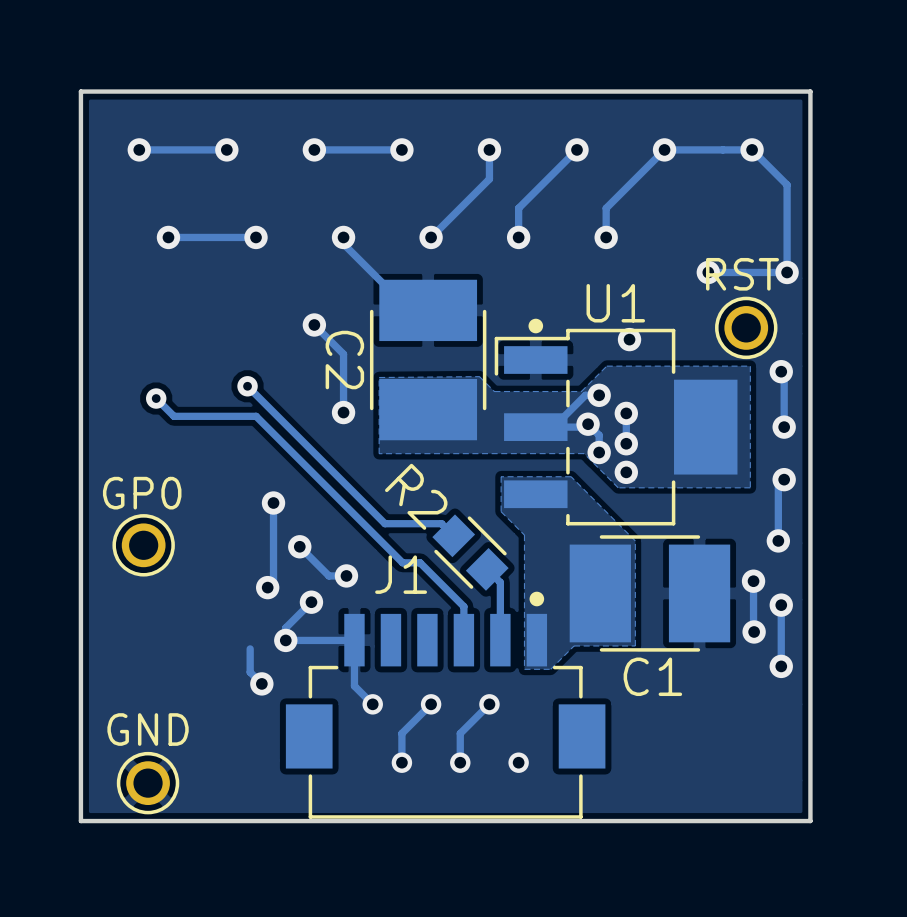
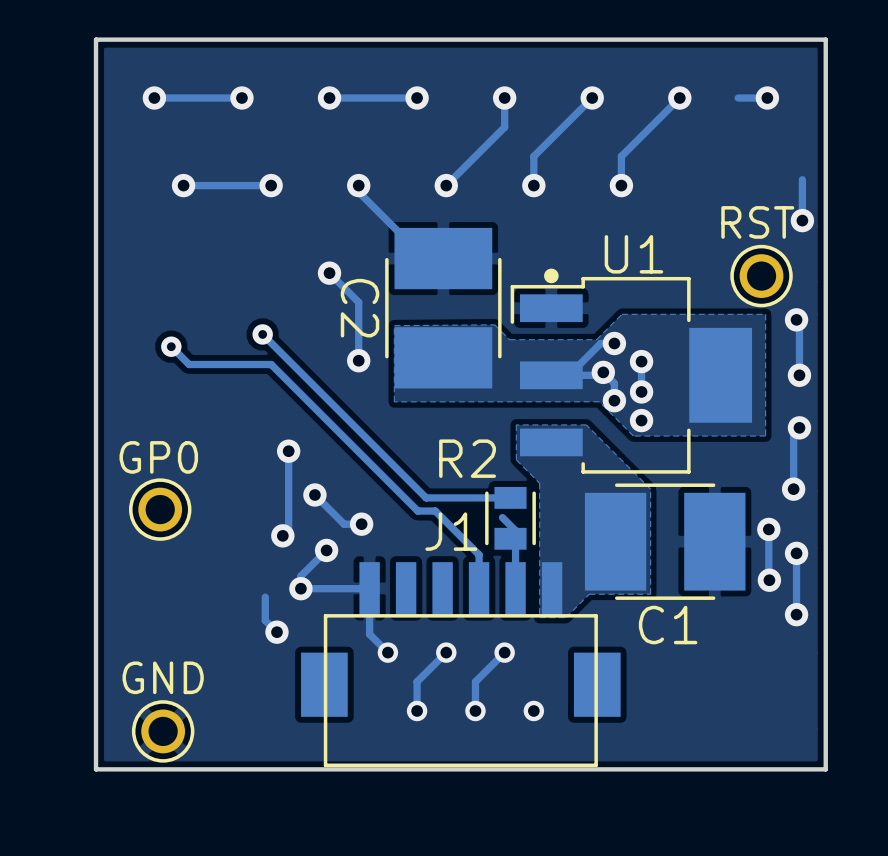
track: (722, 149) (664, 149) -> none
track: (752, 149) (787, 184) (787, 231) -> none
via: (708, 272) -> none
track: (787, 272) (708, 272) -> none
U1 footprint: [494, 318, 738, 526] -> [510, 268, 753, 474]
via: (629, 339) -> none
R2 footprint: [432, 514, 509, 591] -> [485, 486, 536, 550]
track: (384, 523) (441, 523) (453, 535) -> (400, 471) (426, 497) (510, 497)
part position: (143, 545) -> (160, 509)
J1 footprint: [285, 591, 606, 819] -> [301, 562, 621, 768]

